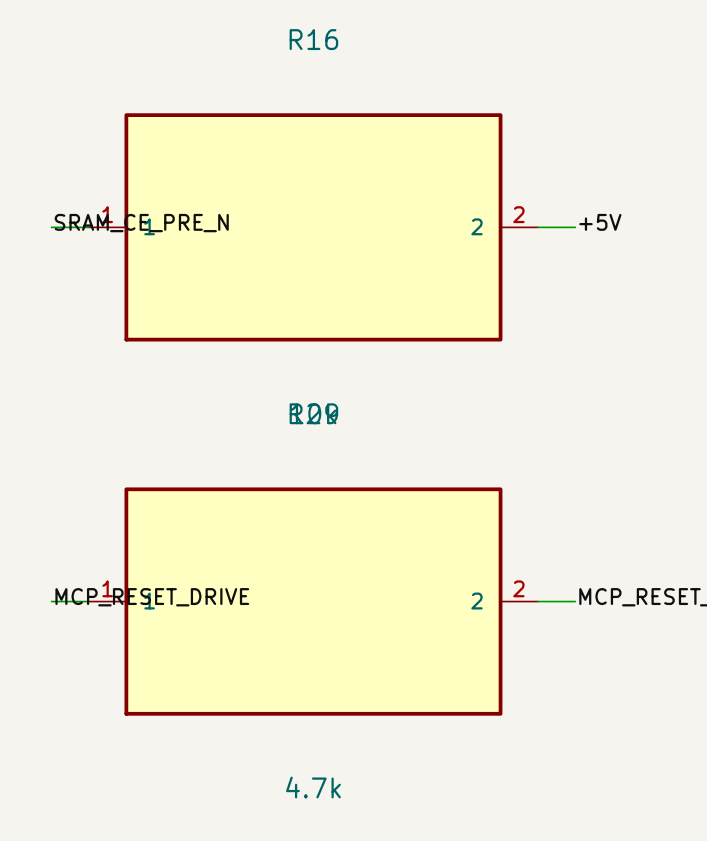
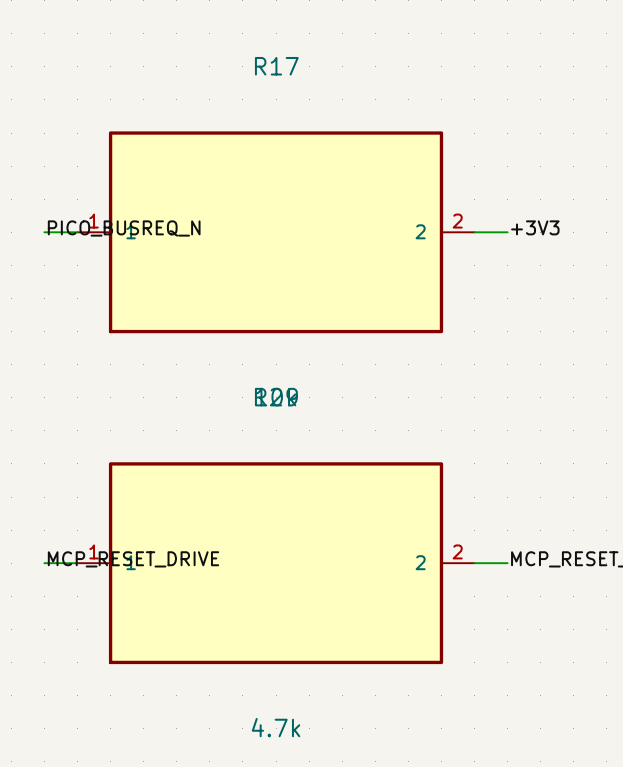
R16 name: R16 (313, 39) -> R17 (276, 66)
label: +5V (600, 222) -> +3V3 (535, 227)
label: SRAM_CE_PRE_N (141, 223) -> PICO_BUSREQ_N (124, 228)

